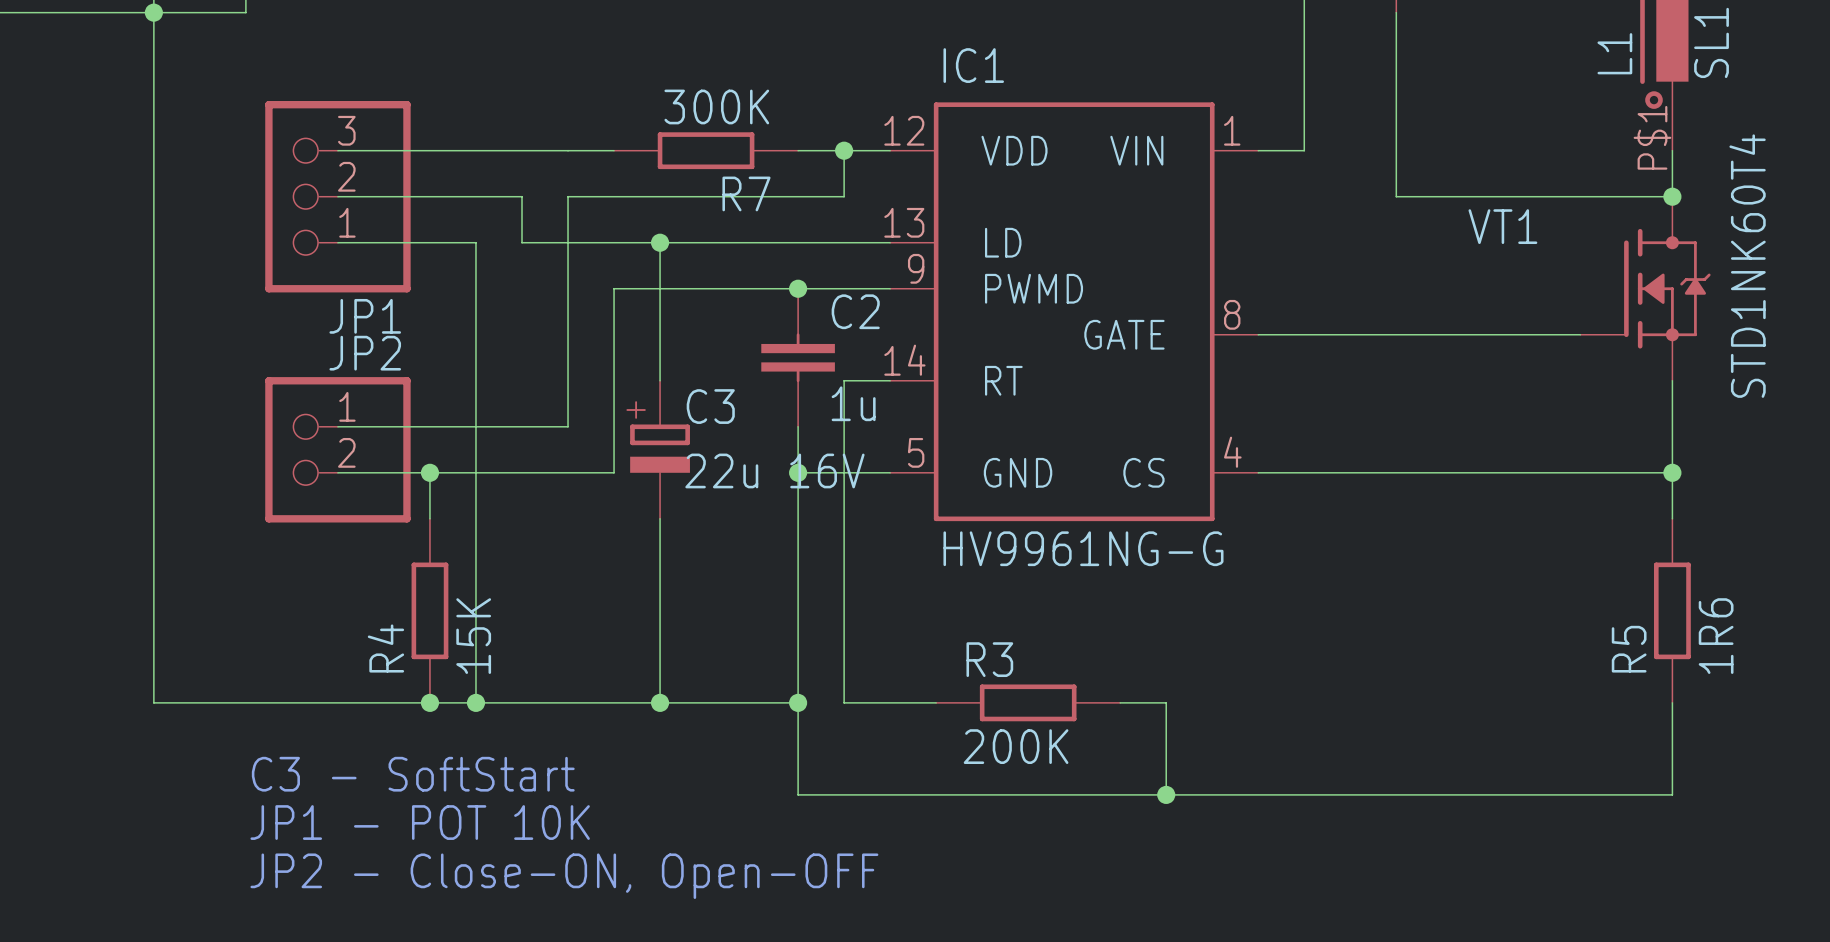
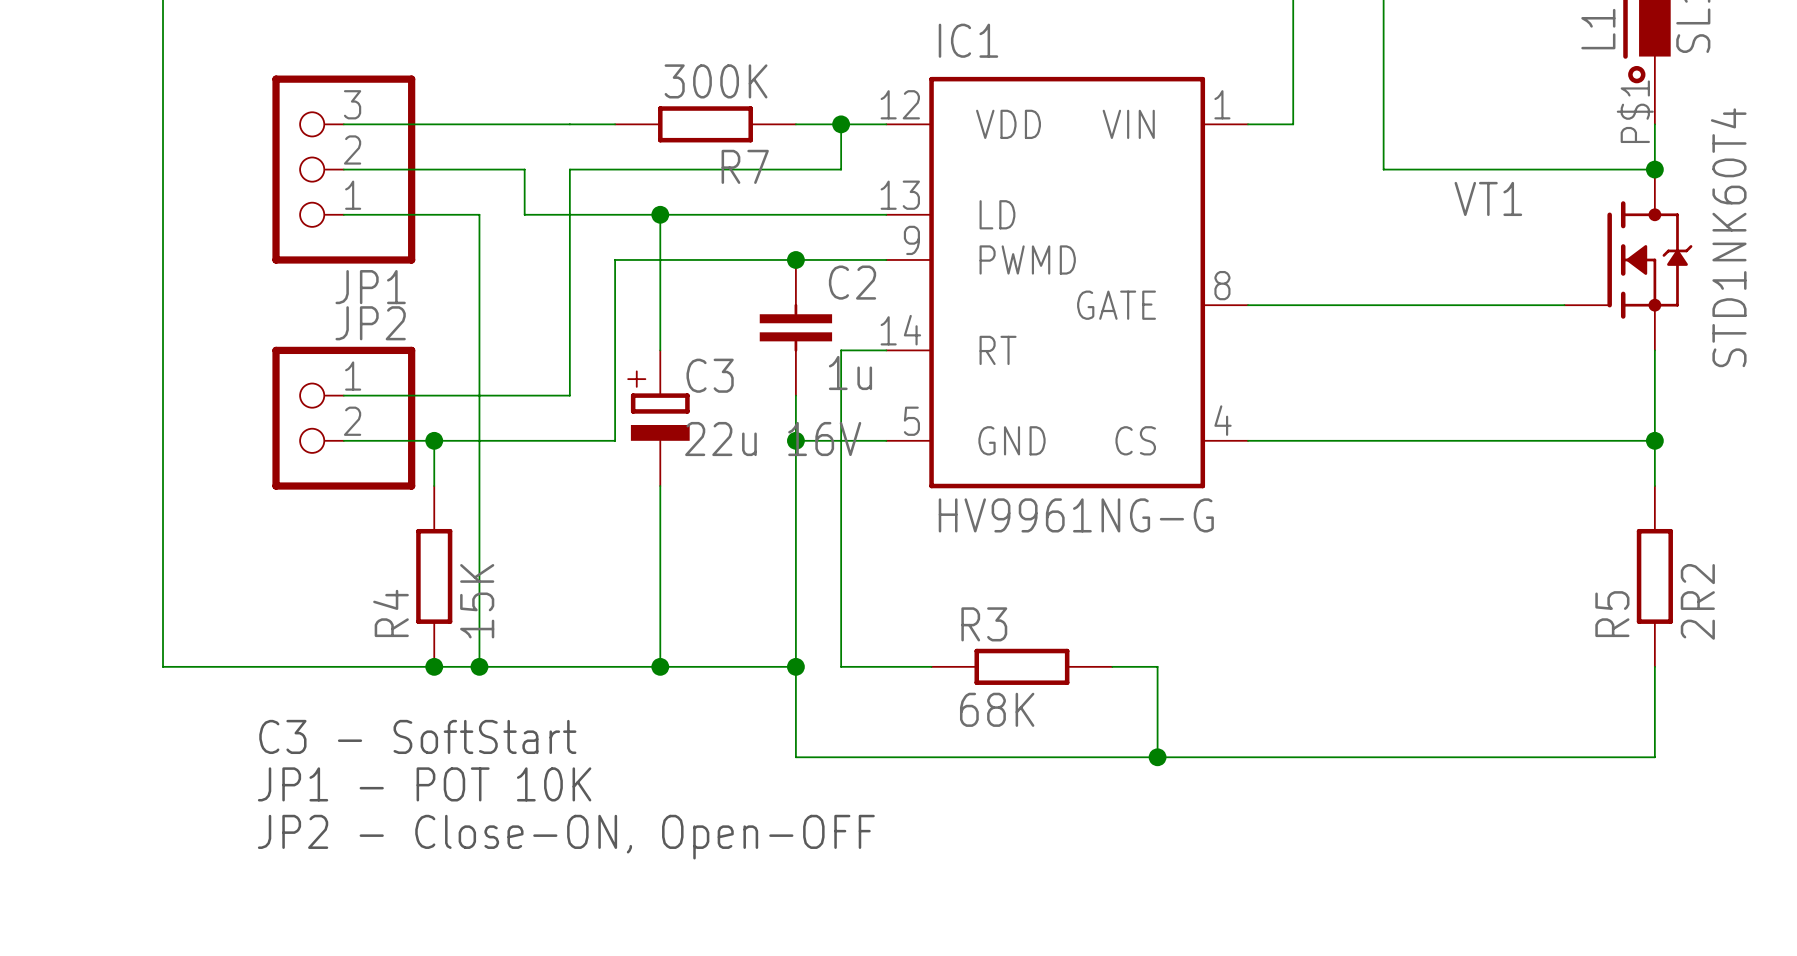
R5 value: 1R6 (1716, 636) -> 2R2 (1697, 601)
R3 value: 200K (1016, 746) -> 68K (997, 709)

